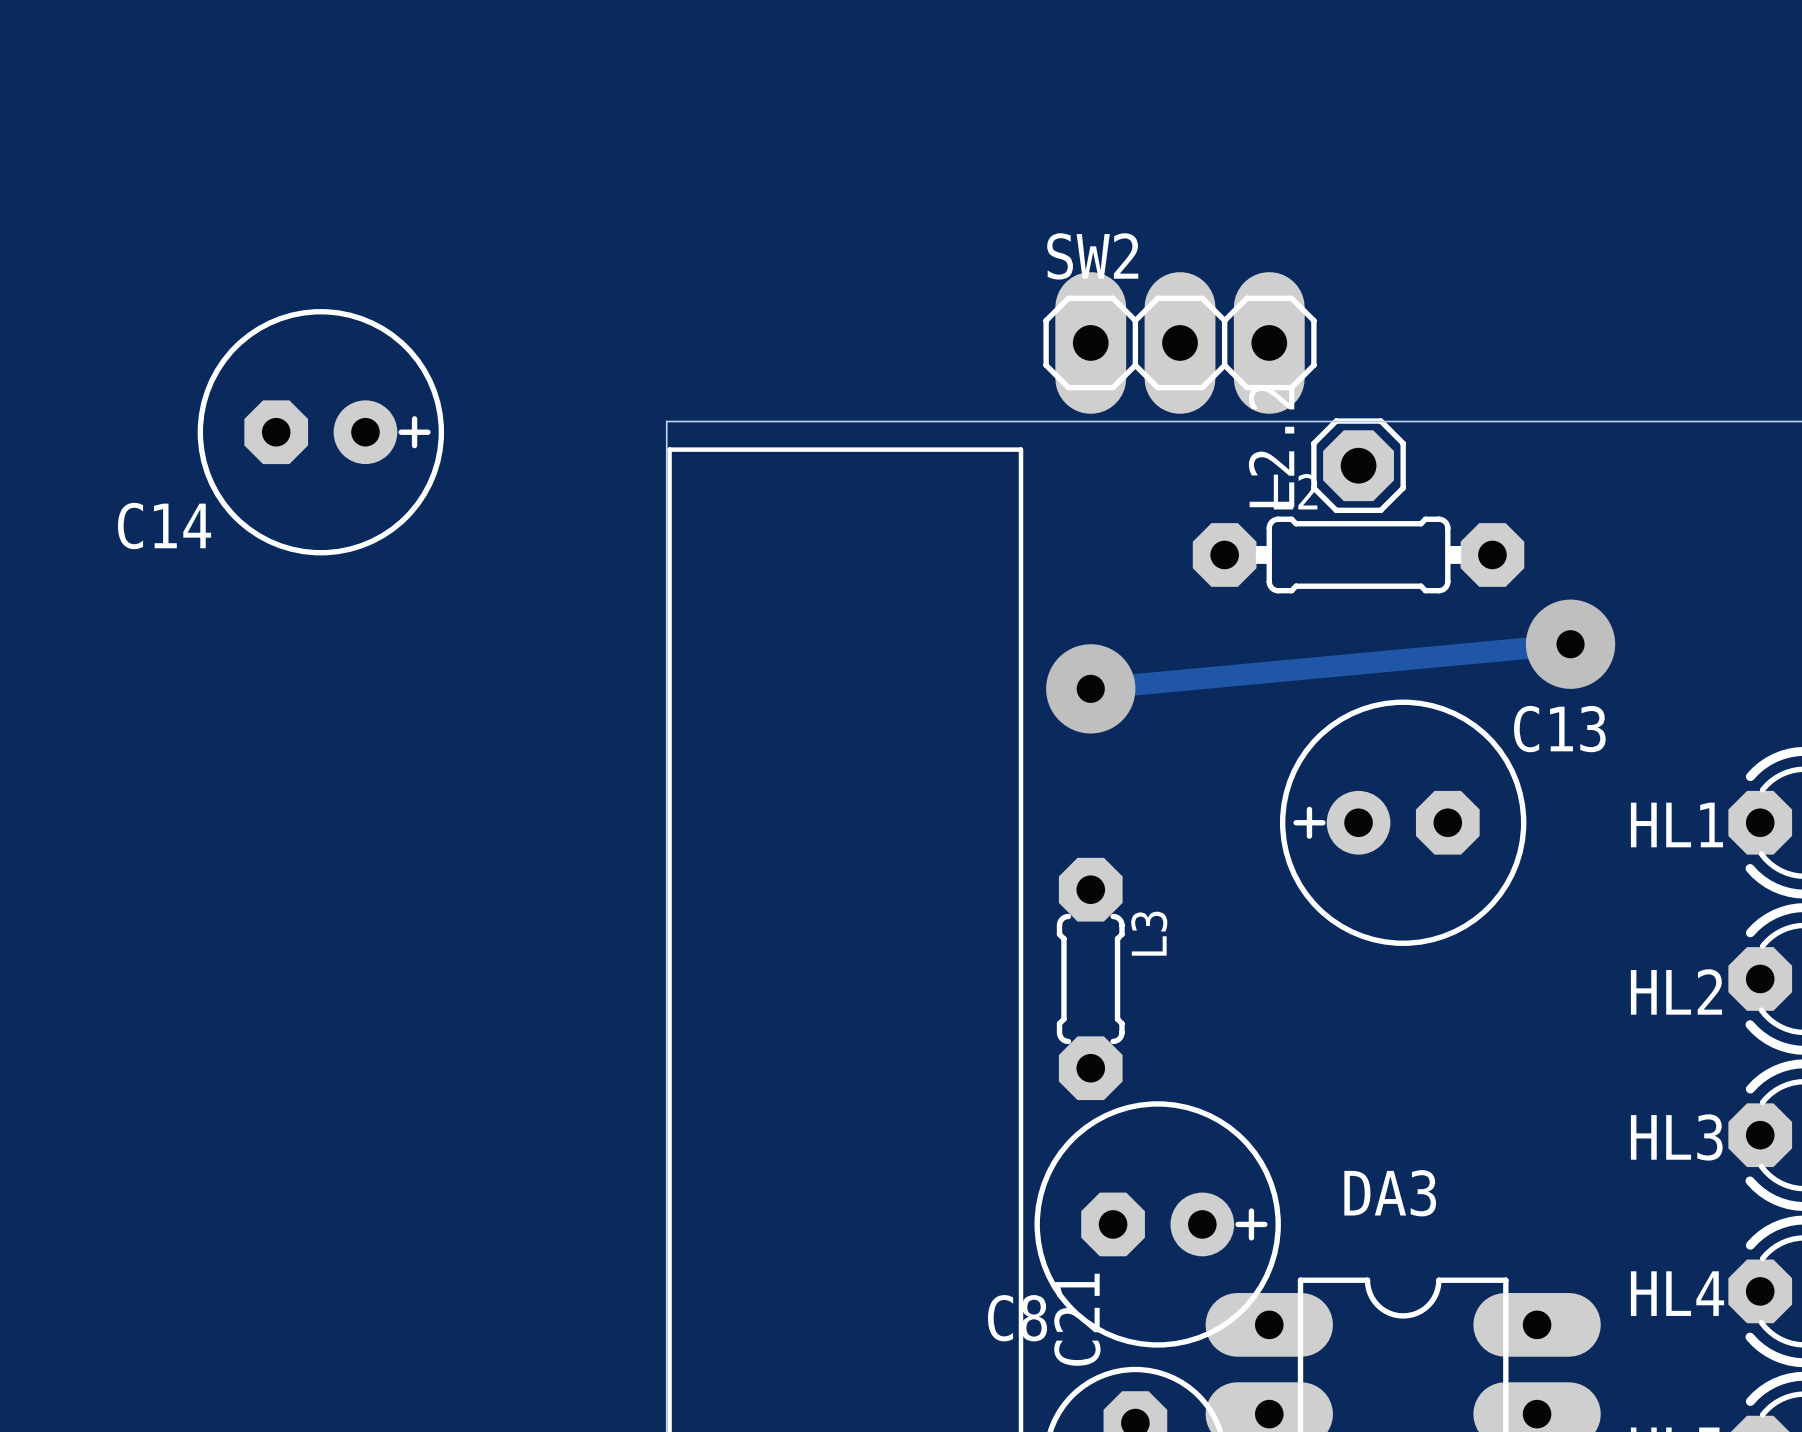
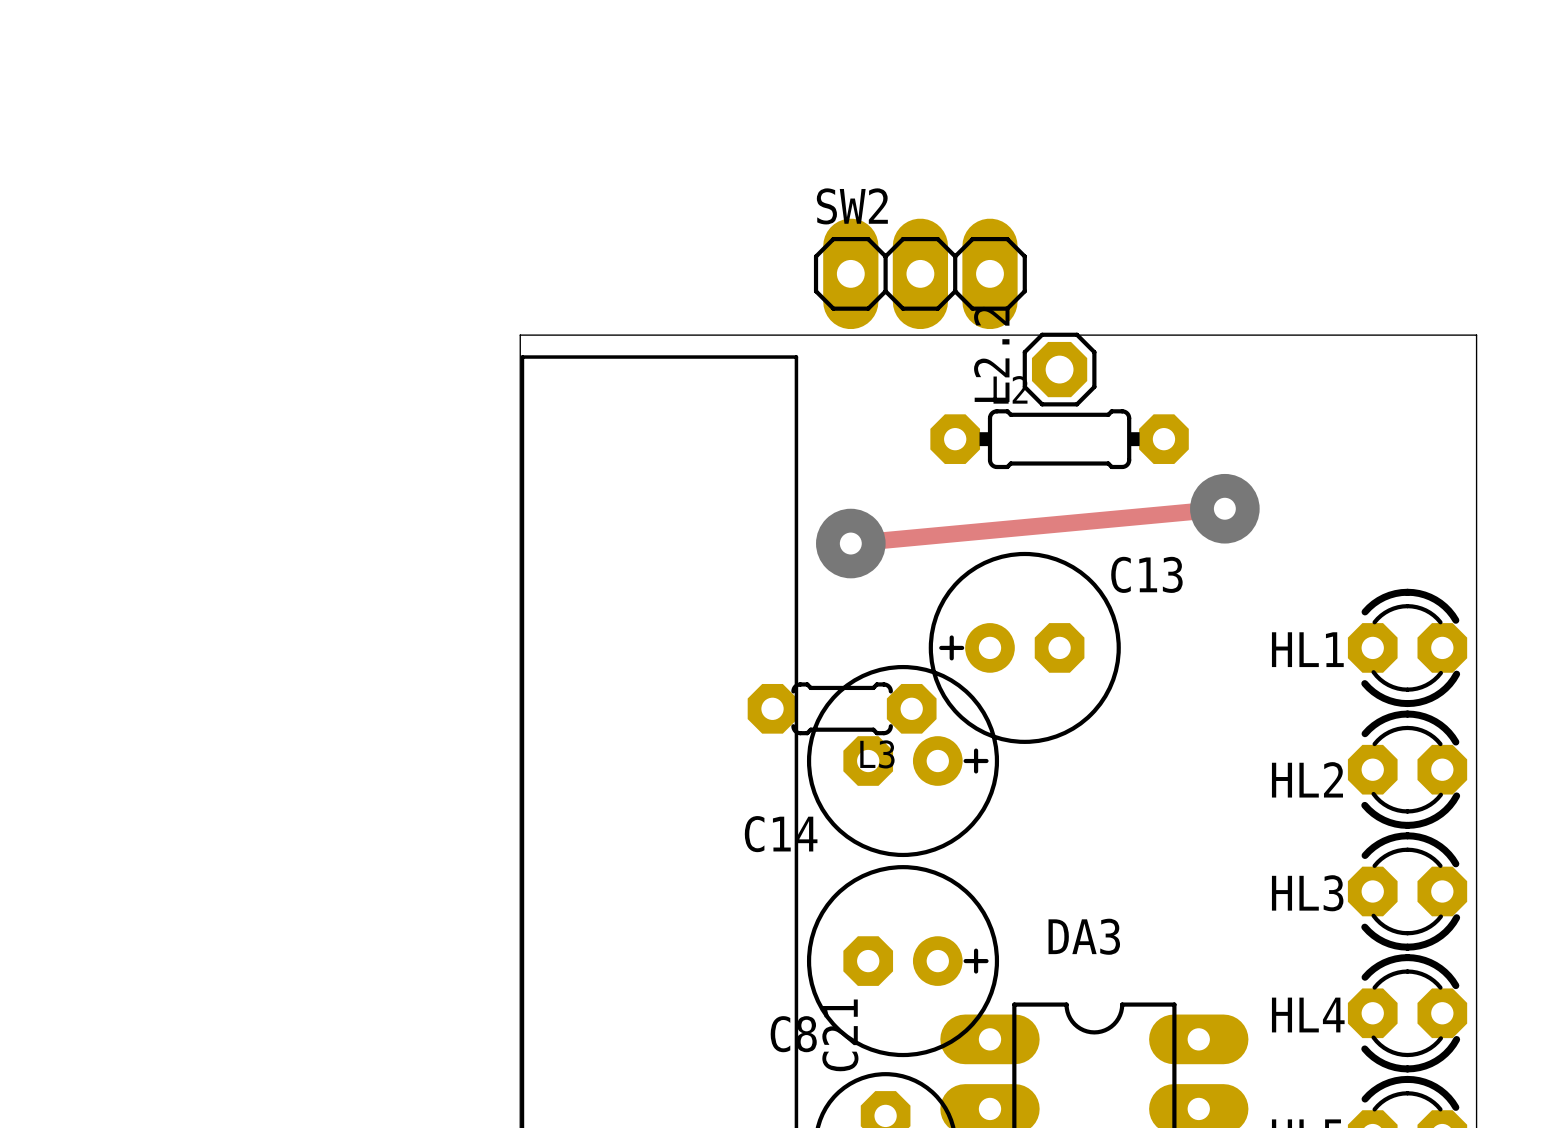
C14 position: (320, 432) -> (903, 761)
C13 position: (1403, 822) -> (1024, 647)
L3 rotation: 0° (1090, 978) -> 90° clockwise (842, 708)

